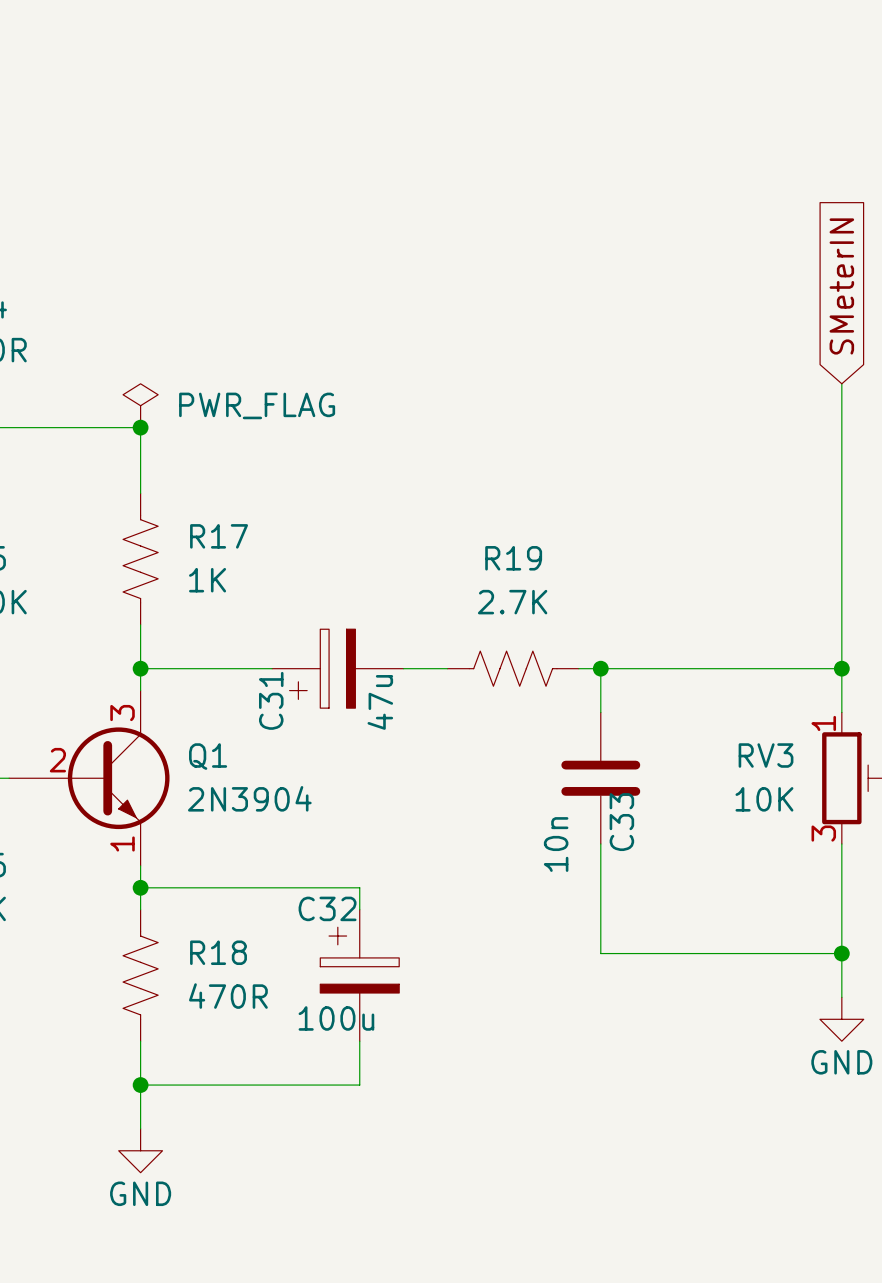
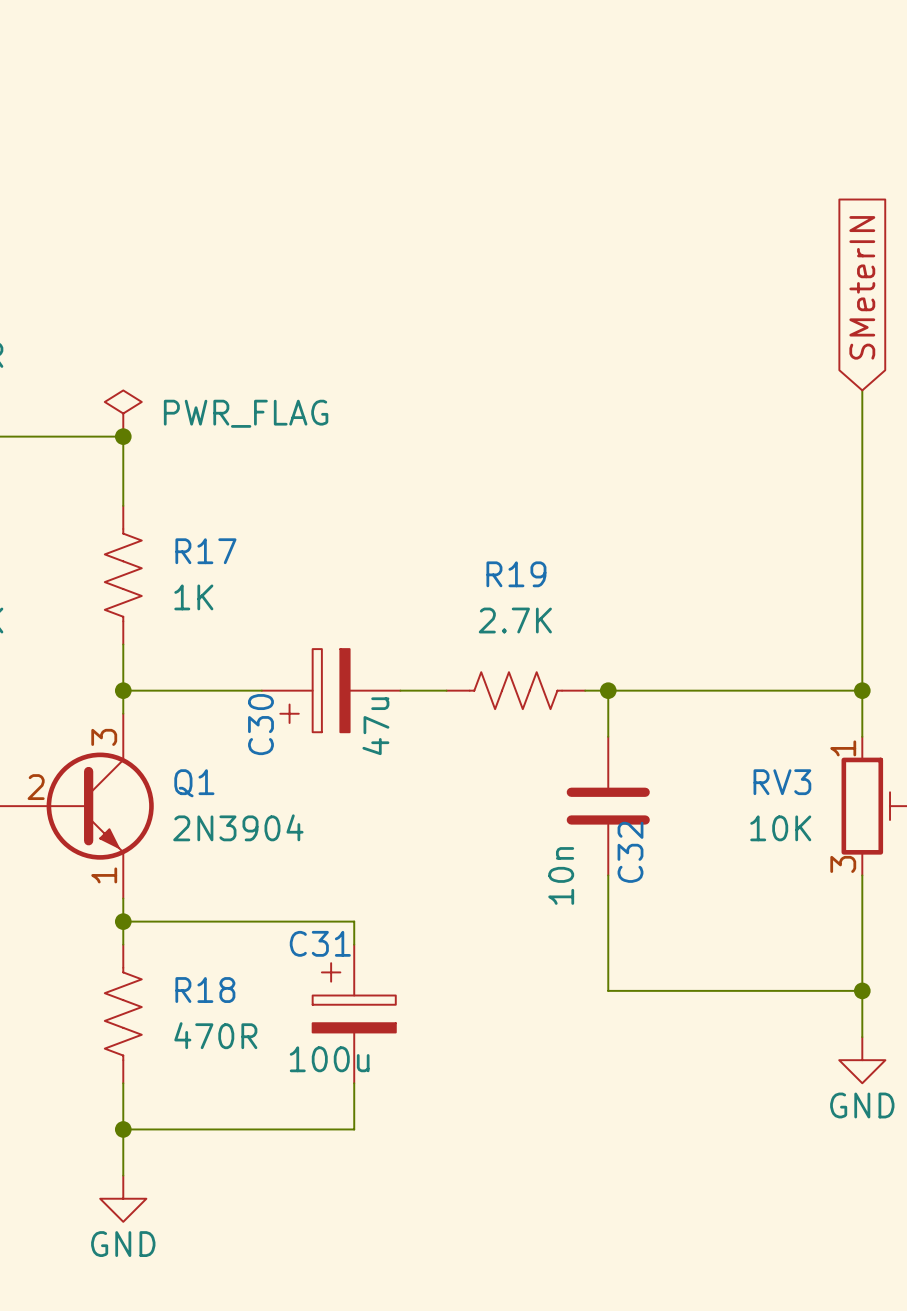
C31 name: C31 (271, 700) -> C30 (260, 724)
C33 name: C33 (621, 822) -> C32 (630, 852)
C32 name: C32 (327, 908) -> C31 (320, 943)

